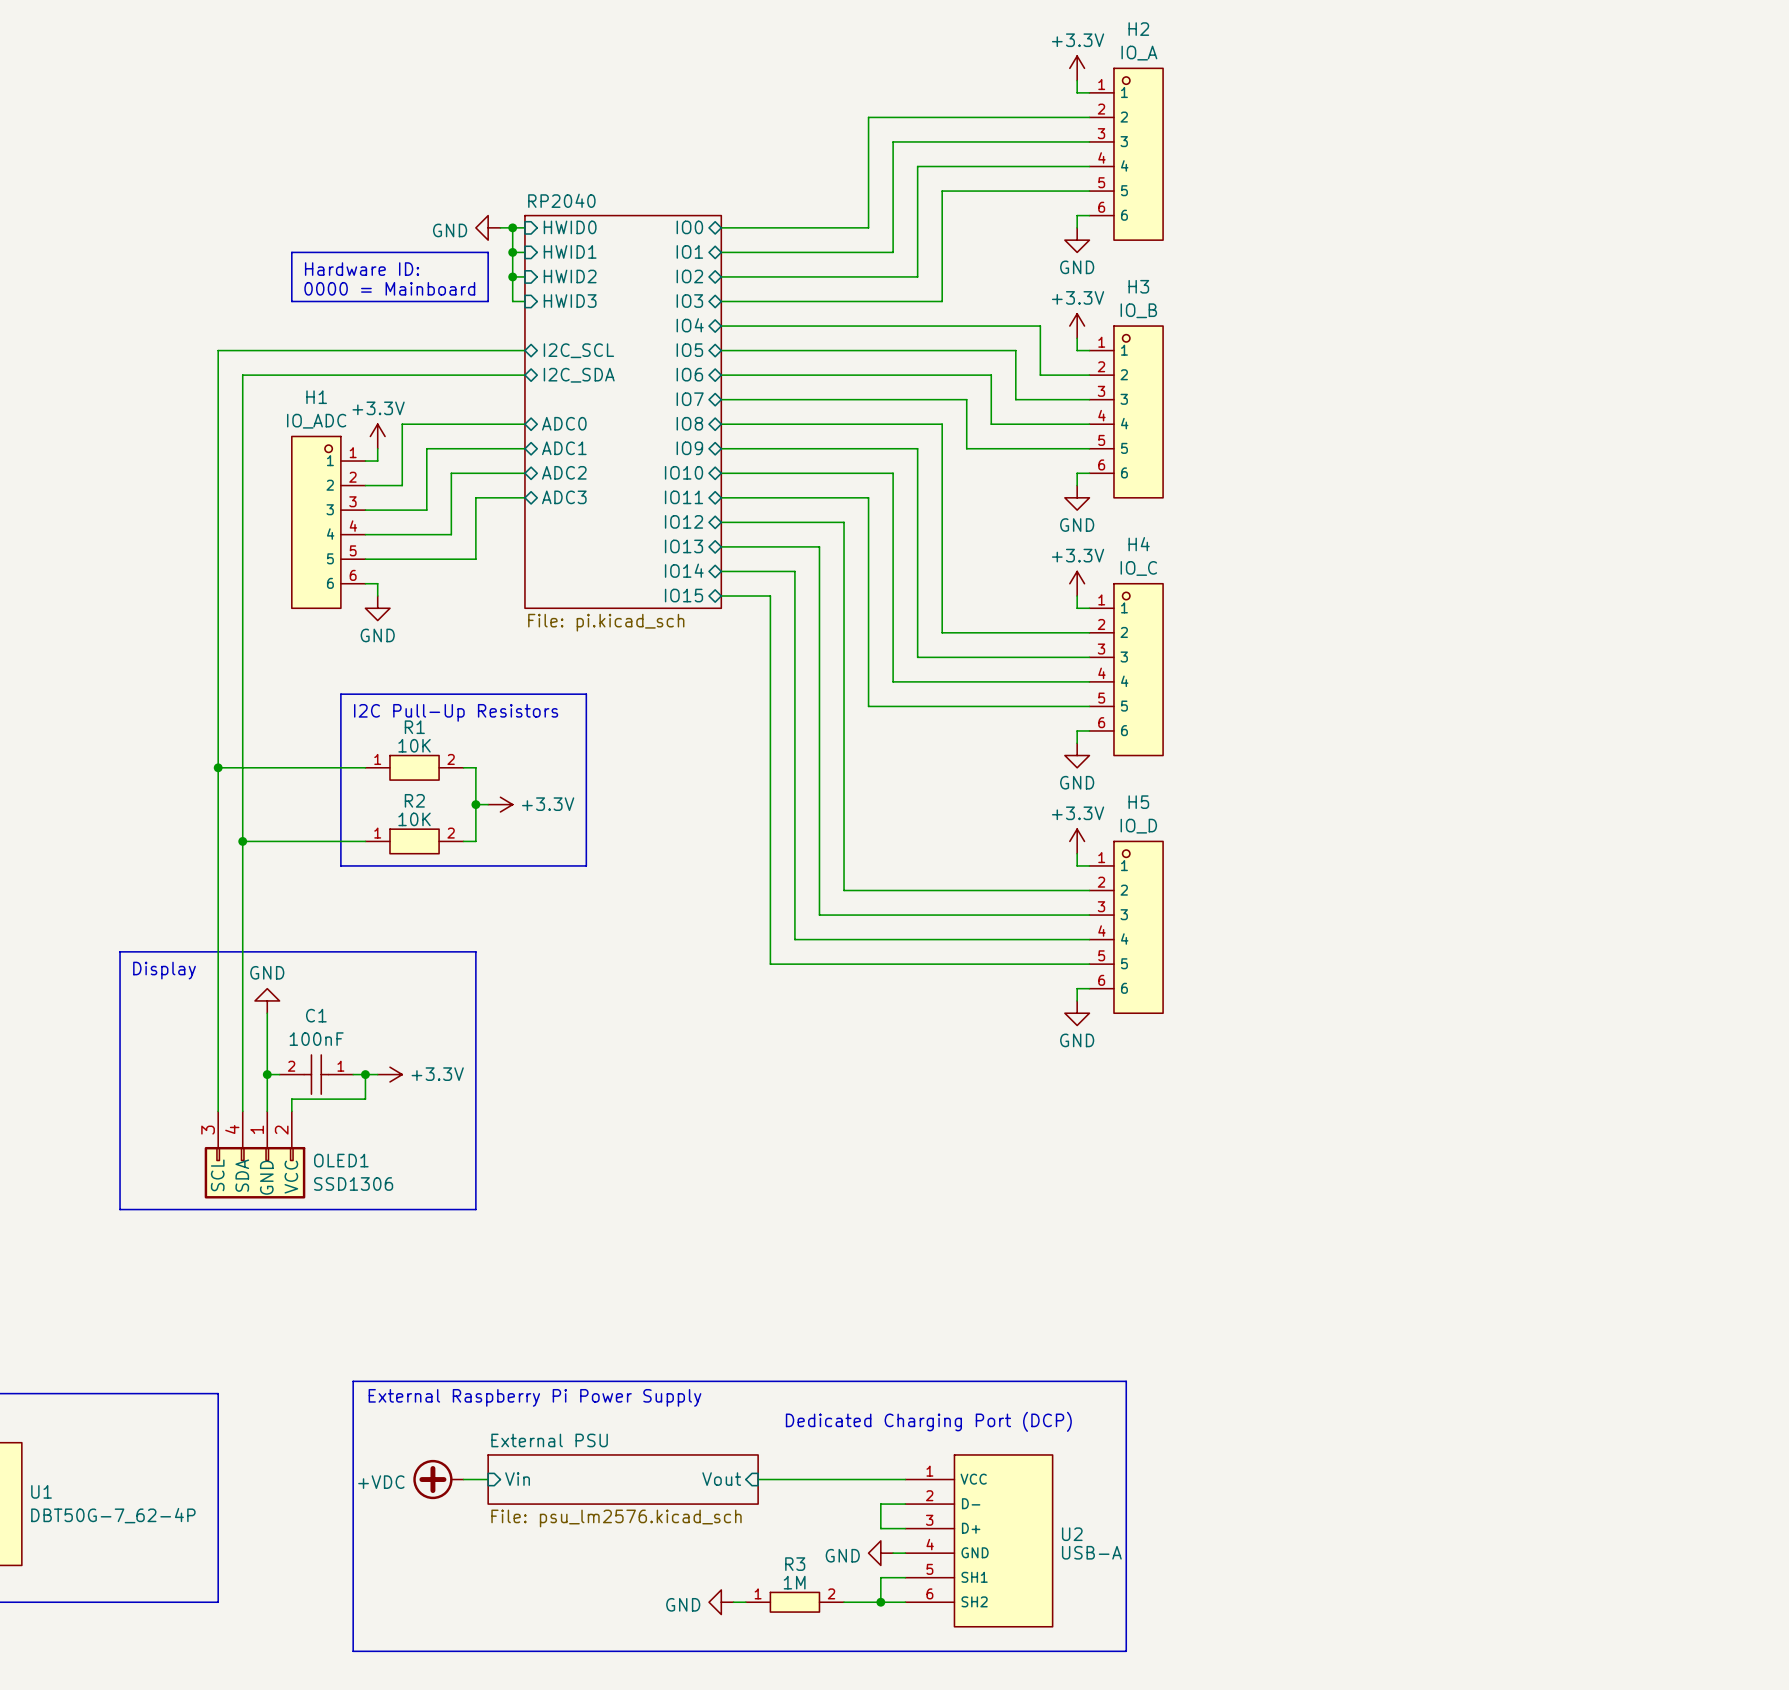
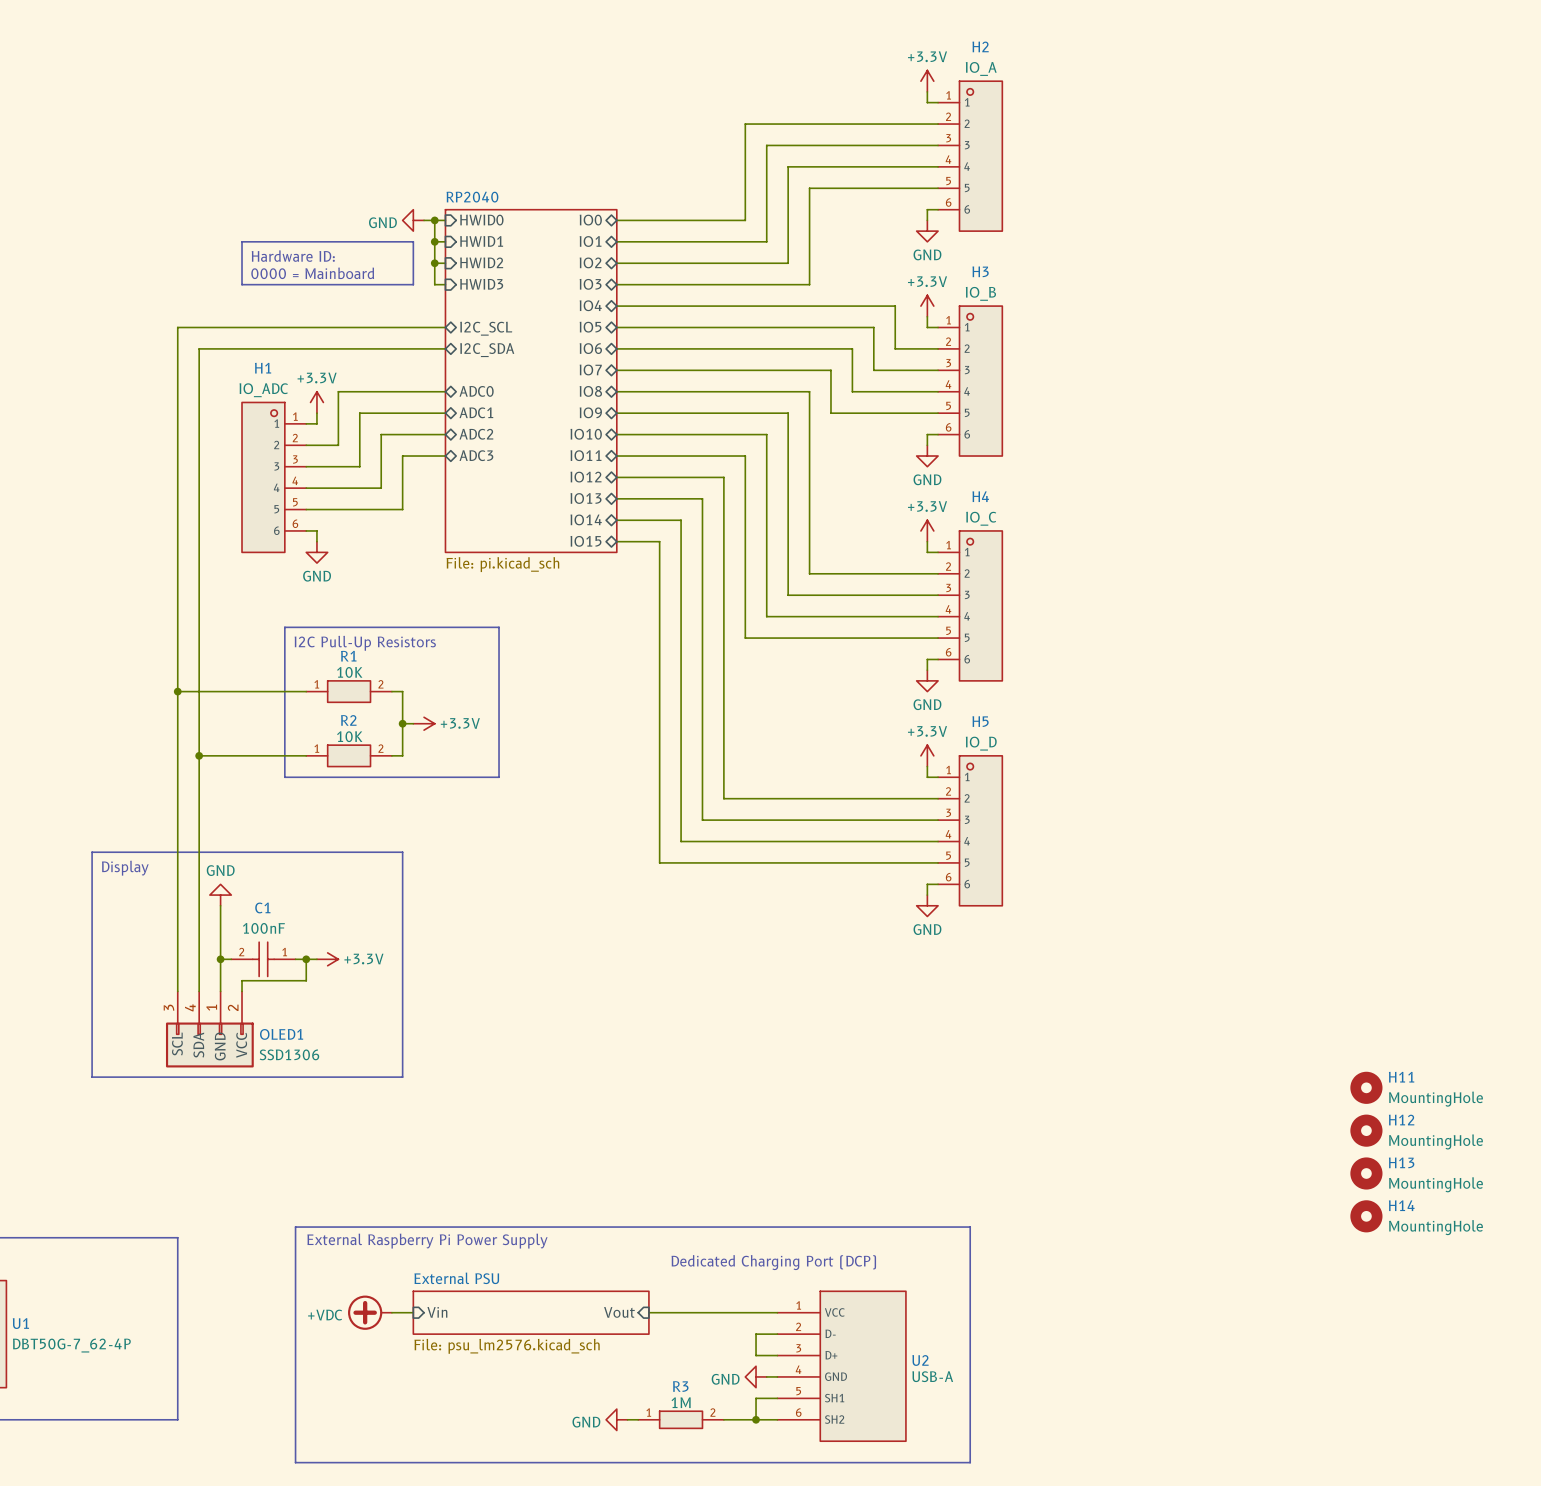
H11: none -> MountingHole (1366, 1087)
H12: none -> MountingHole (1366, 1130)
H13: none -> MountingHole (1366, 1173)
H14: none -> MountingHole (1366, 1216)

